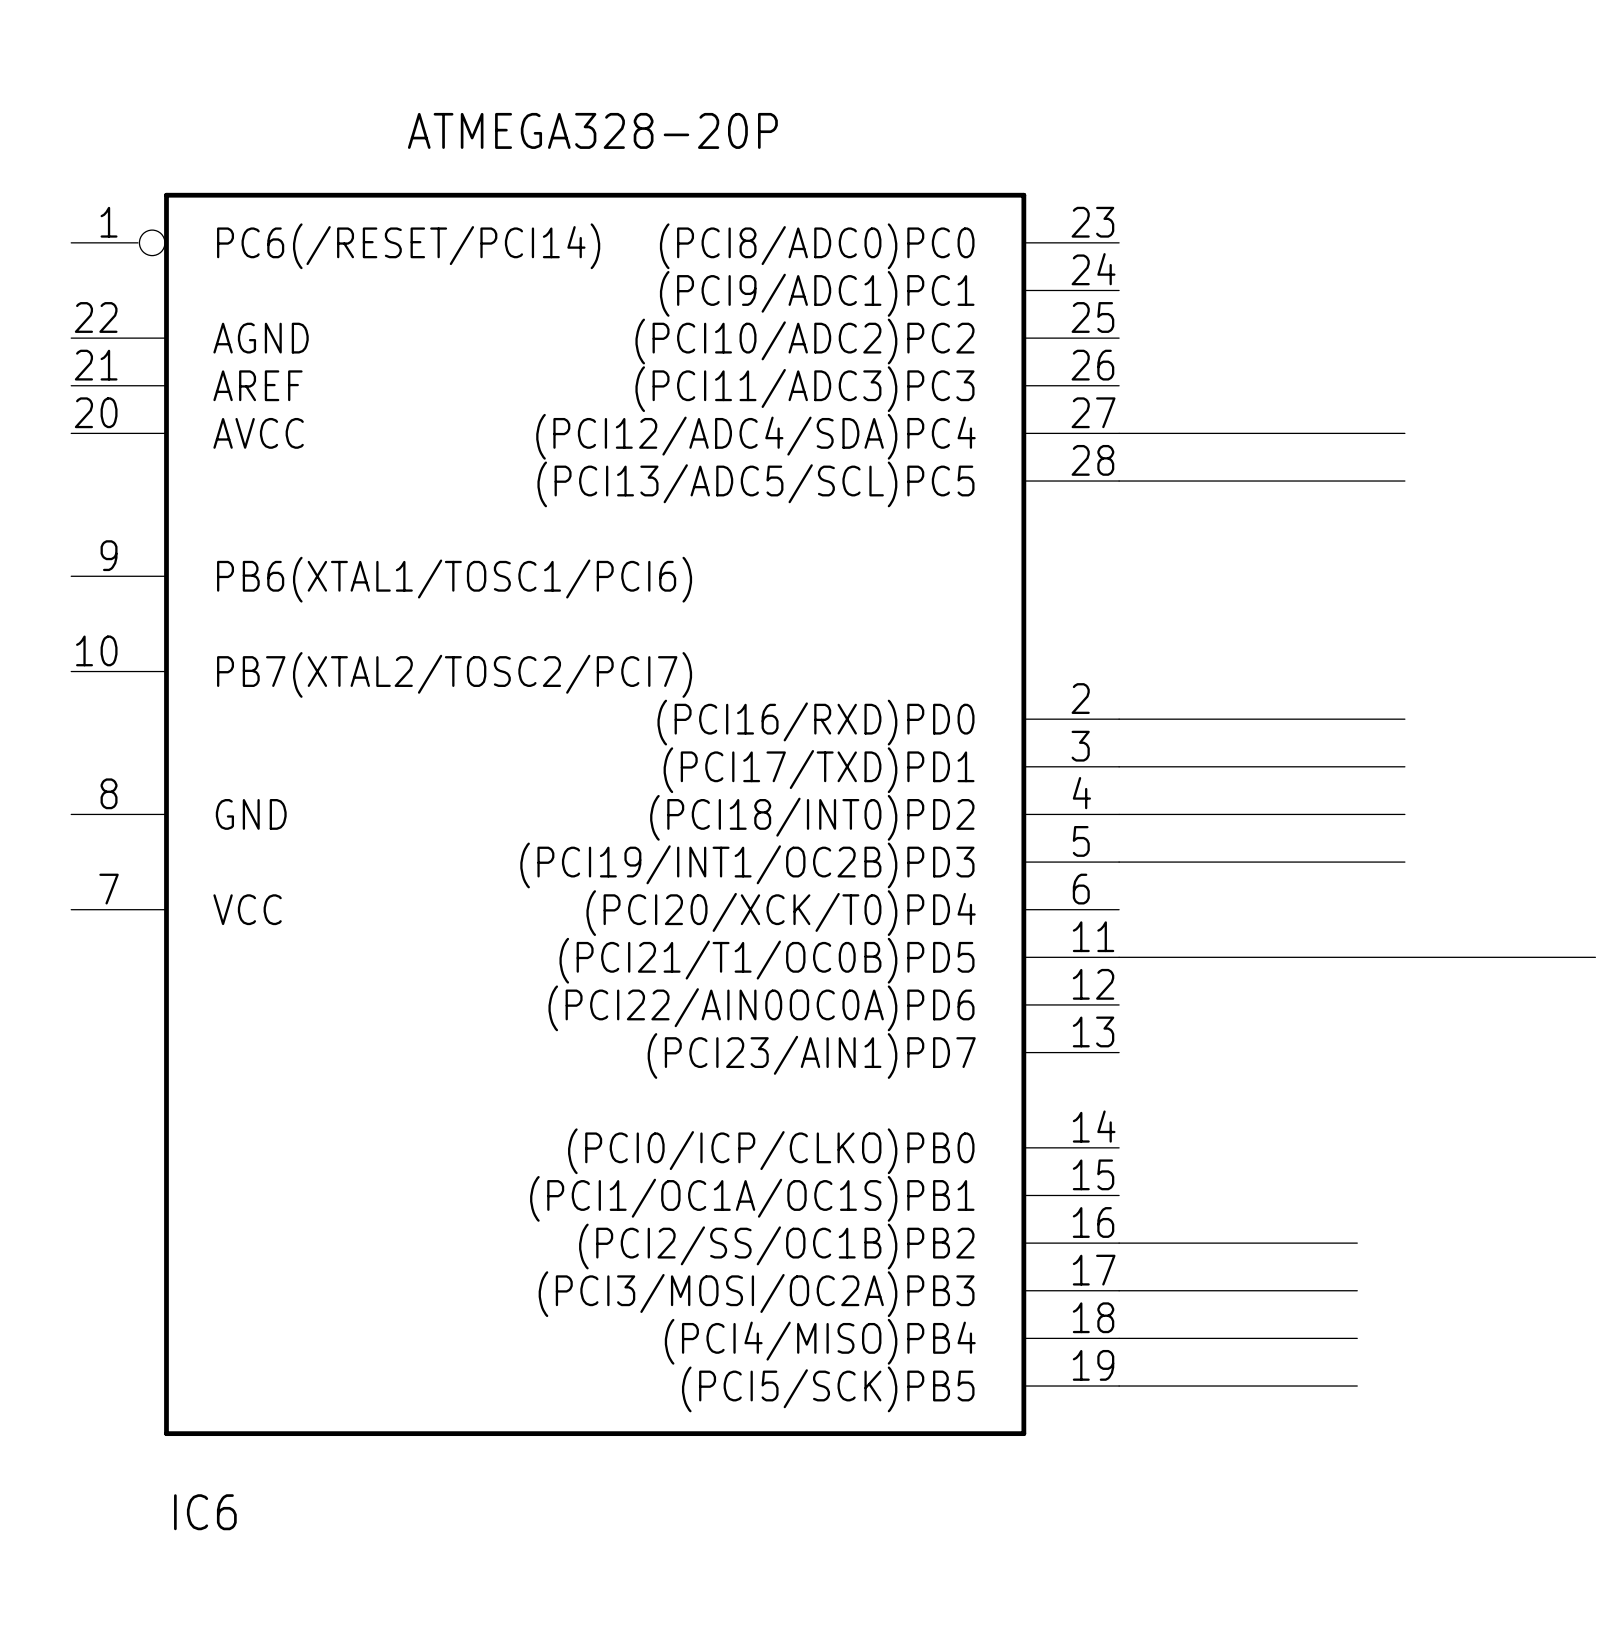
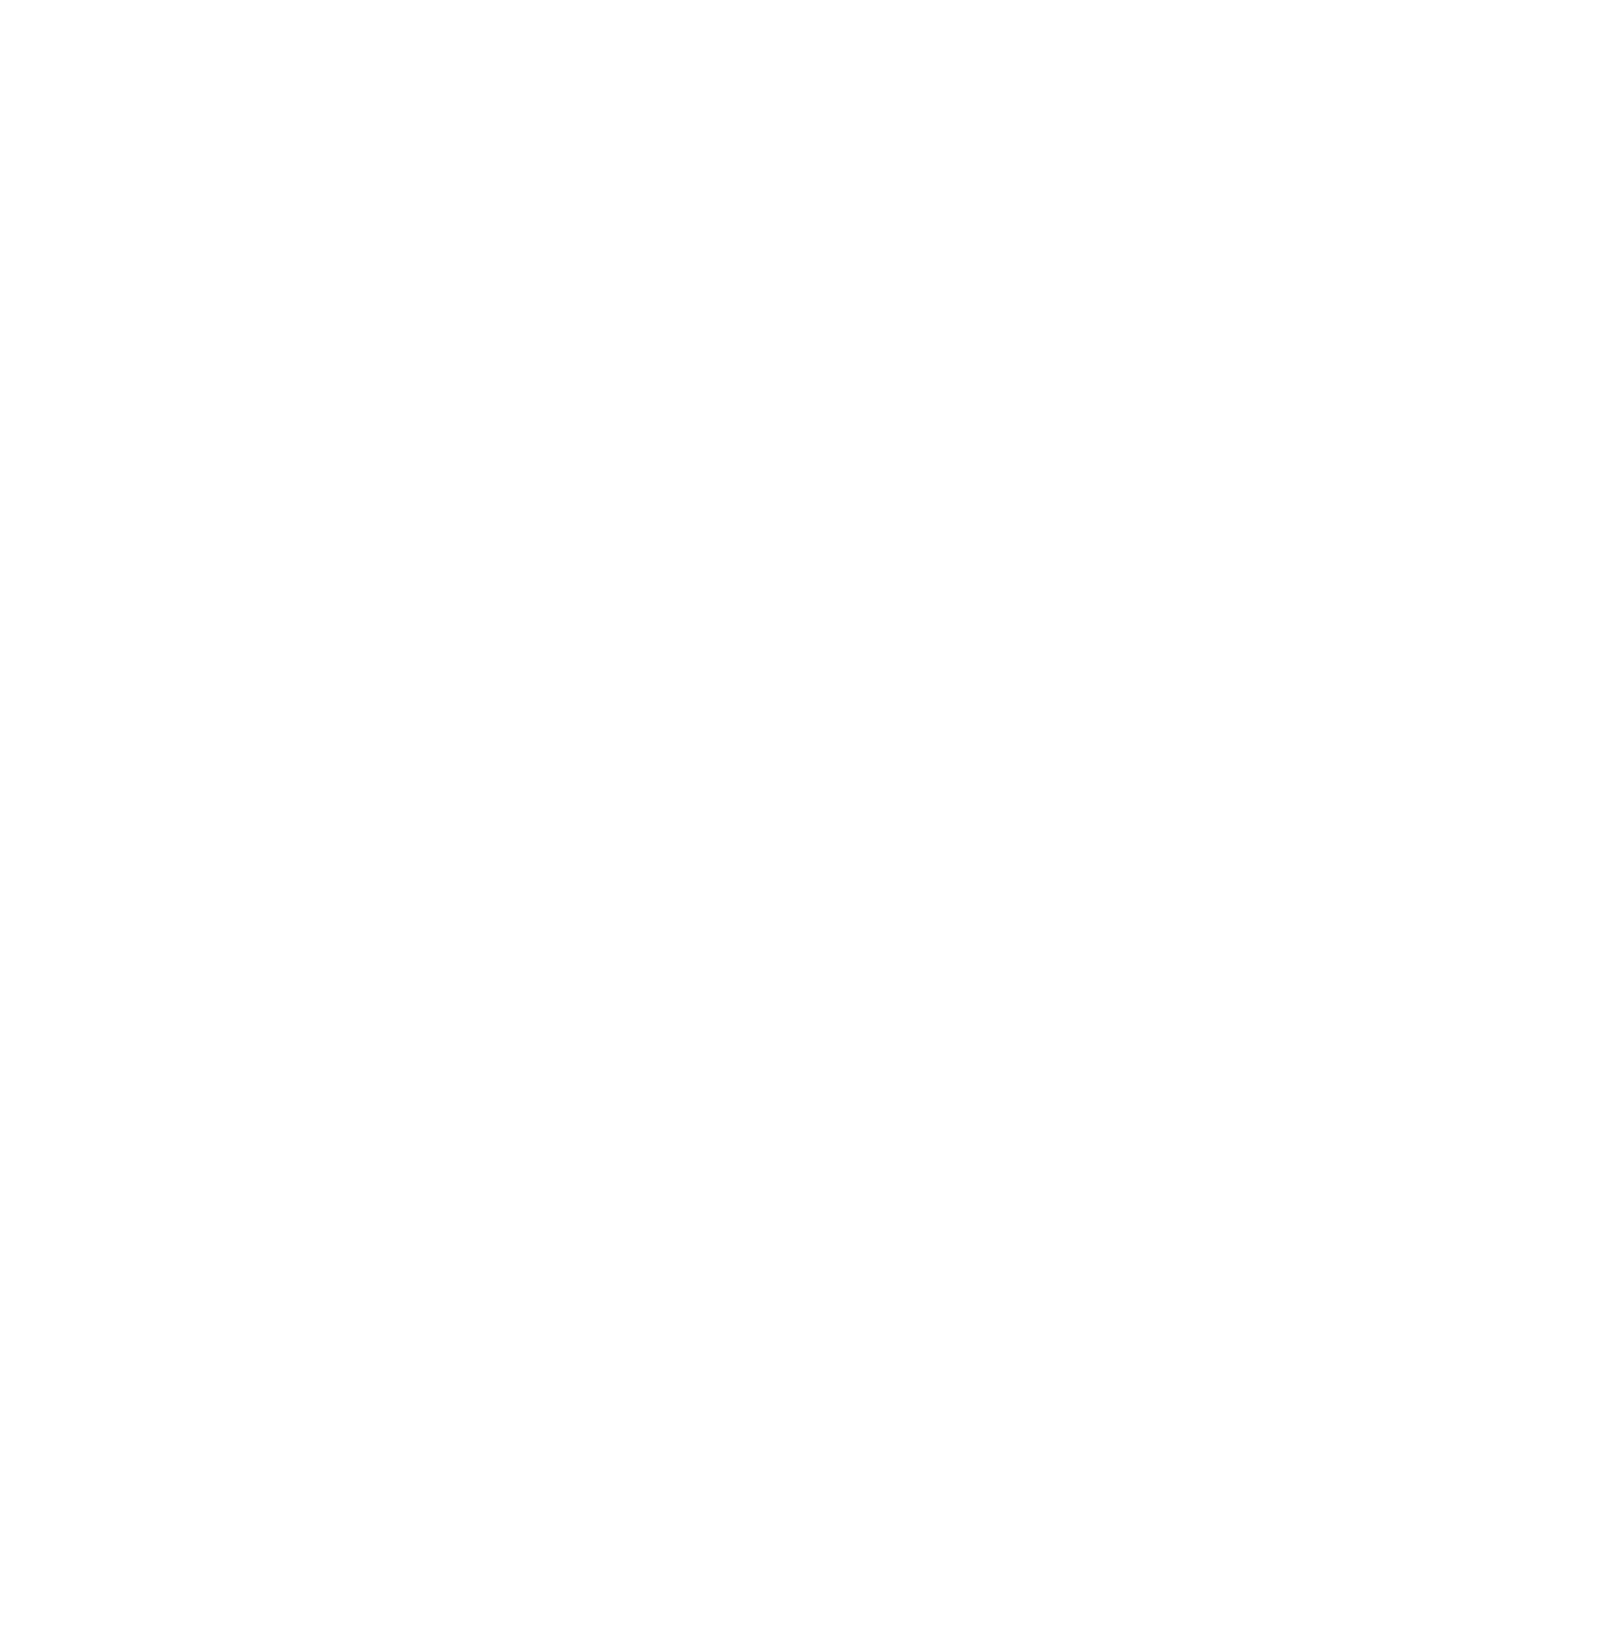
wire: (1119, 433) (1404, 433) -> none
wire: (1119, 481) (1404, 481) -> none
wire: (1119, 719) (1404, 719) -> none
wire: (1119, 766) (1404, 766) -> none
IC6: ATMEGA328-20P (595, 814) -> none
wire: (1119, 814) (1404, 814) -> none
wire: (1119, 862) (1404, 862) -> none
wire: (1119, 957) (1595, 957) -> none
wire: (1119, 1243) (1357, 1243) -> none
wire: (1119, 1290) (1357, 1290) -> none
wire: (1119, 1338) (1357, 1338) -> none
wire: (1119, 1386) (1357, 1386) -> none

